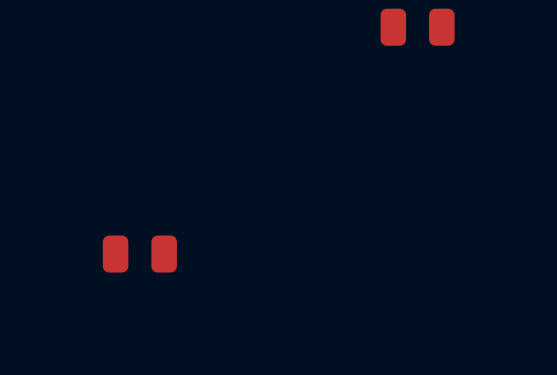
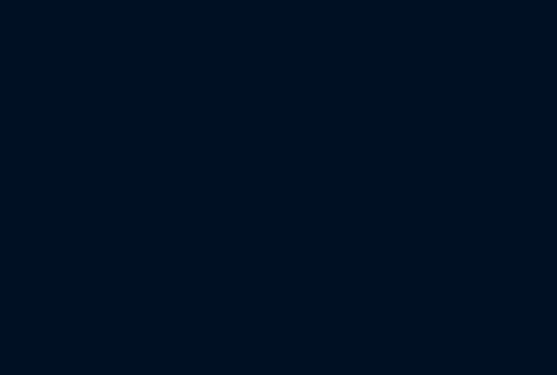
part: (417, 27) -> none
part: (139, 254) -> none

